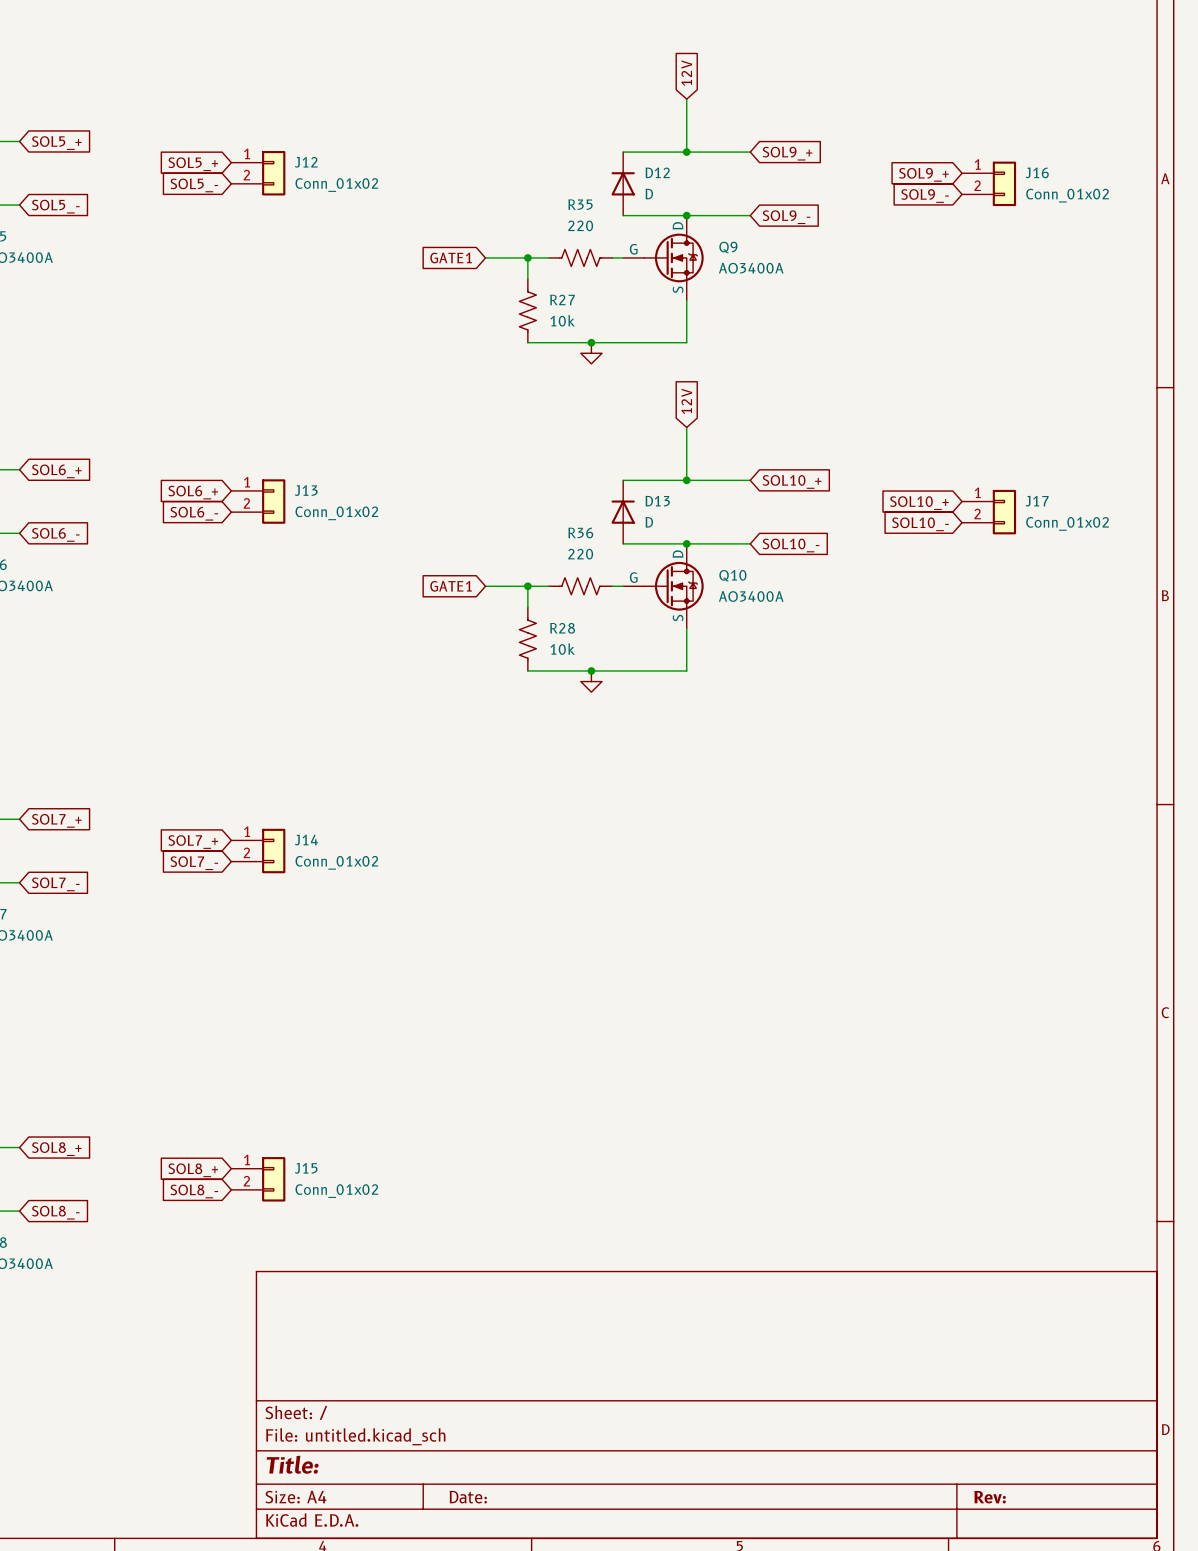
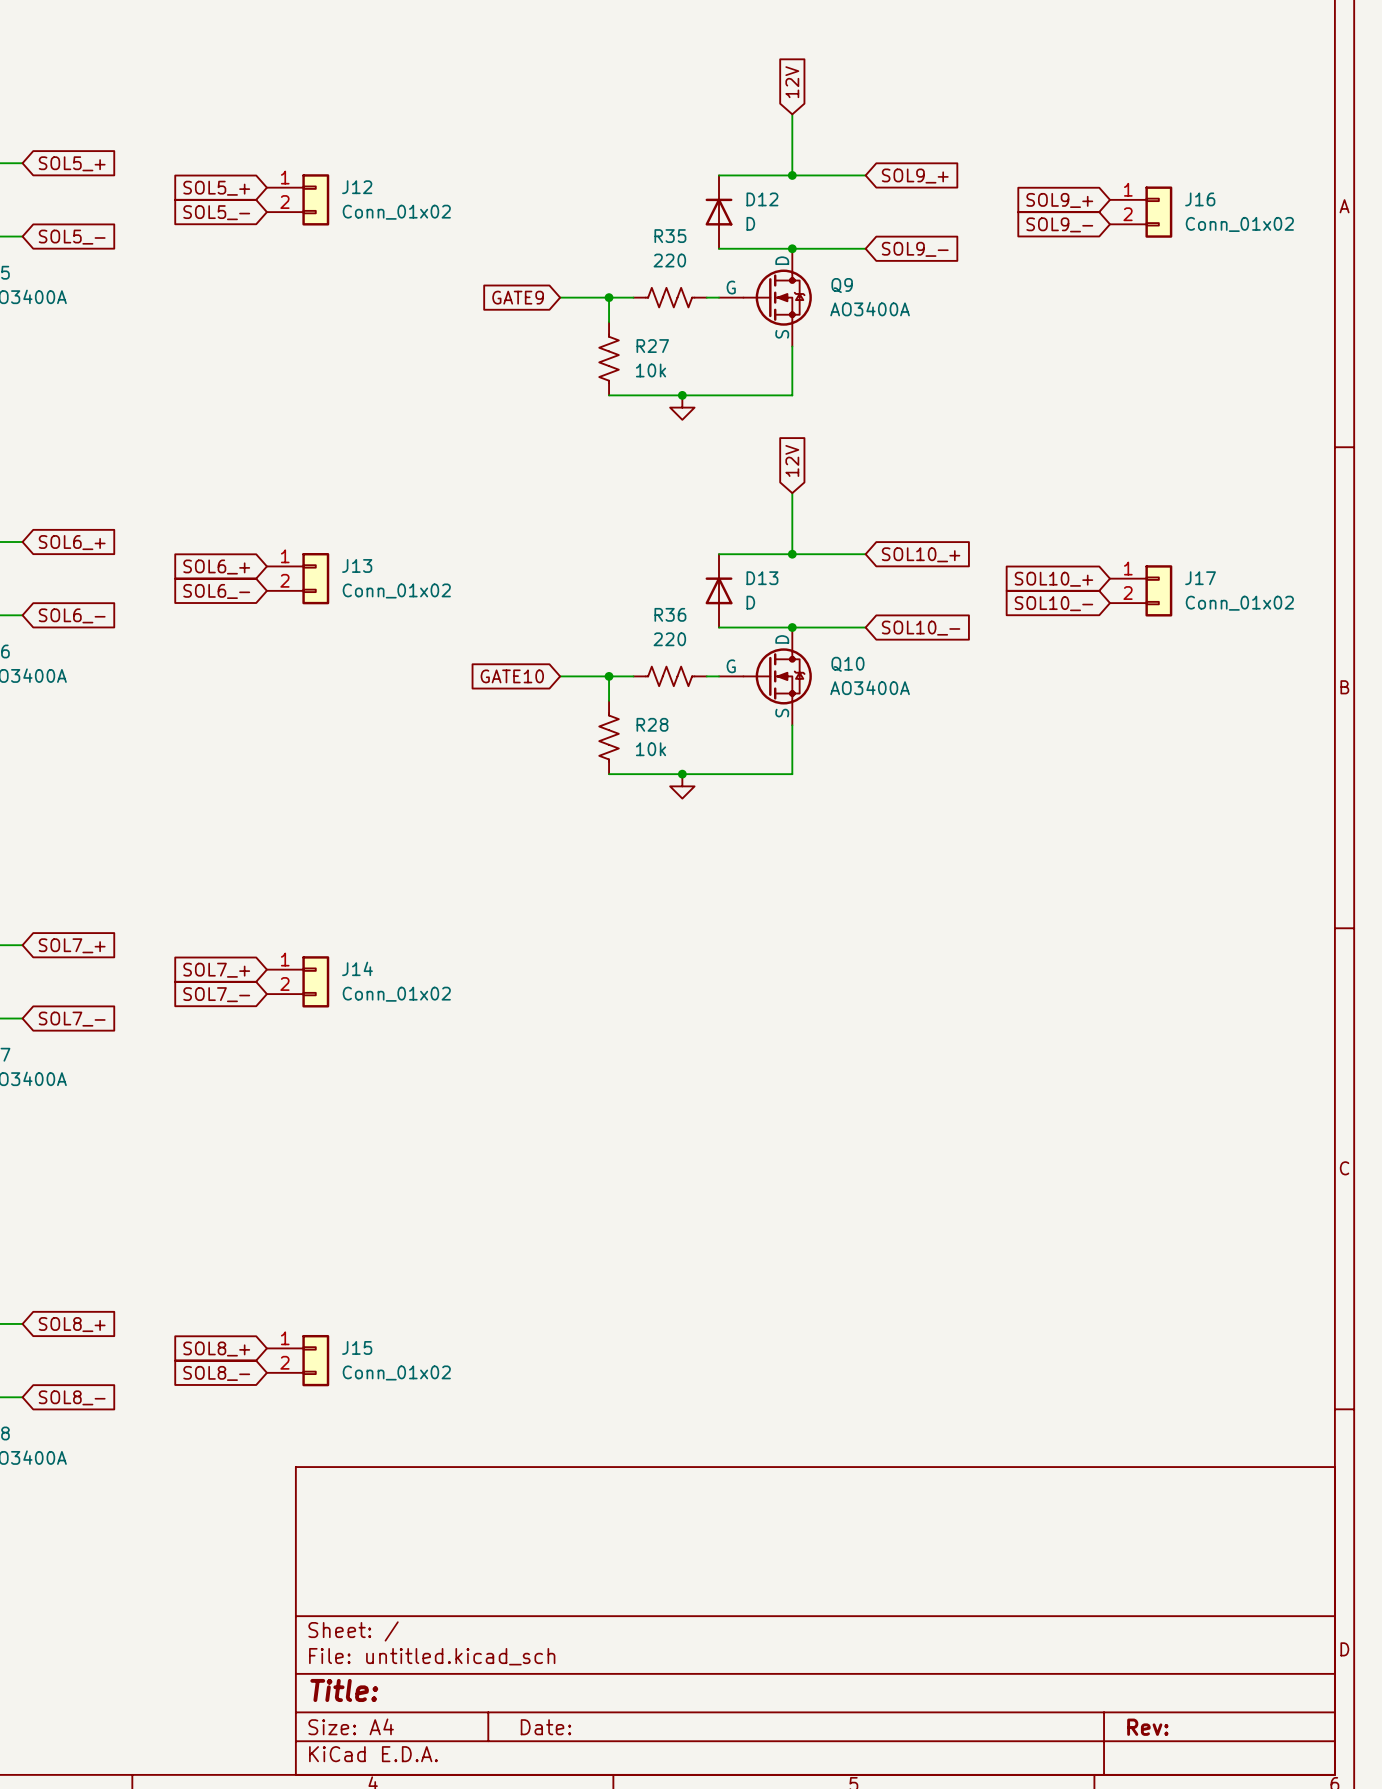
global label: GATE1 (451, 258) -> GATE9 (518, 297)
global label: GATE1 (451, 586) -> GATE10 (512, 676)

